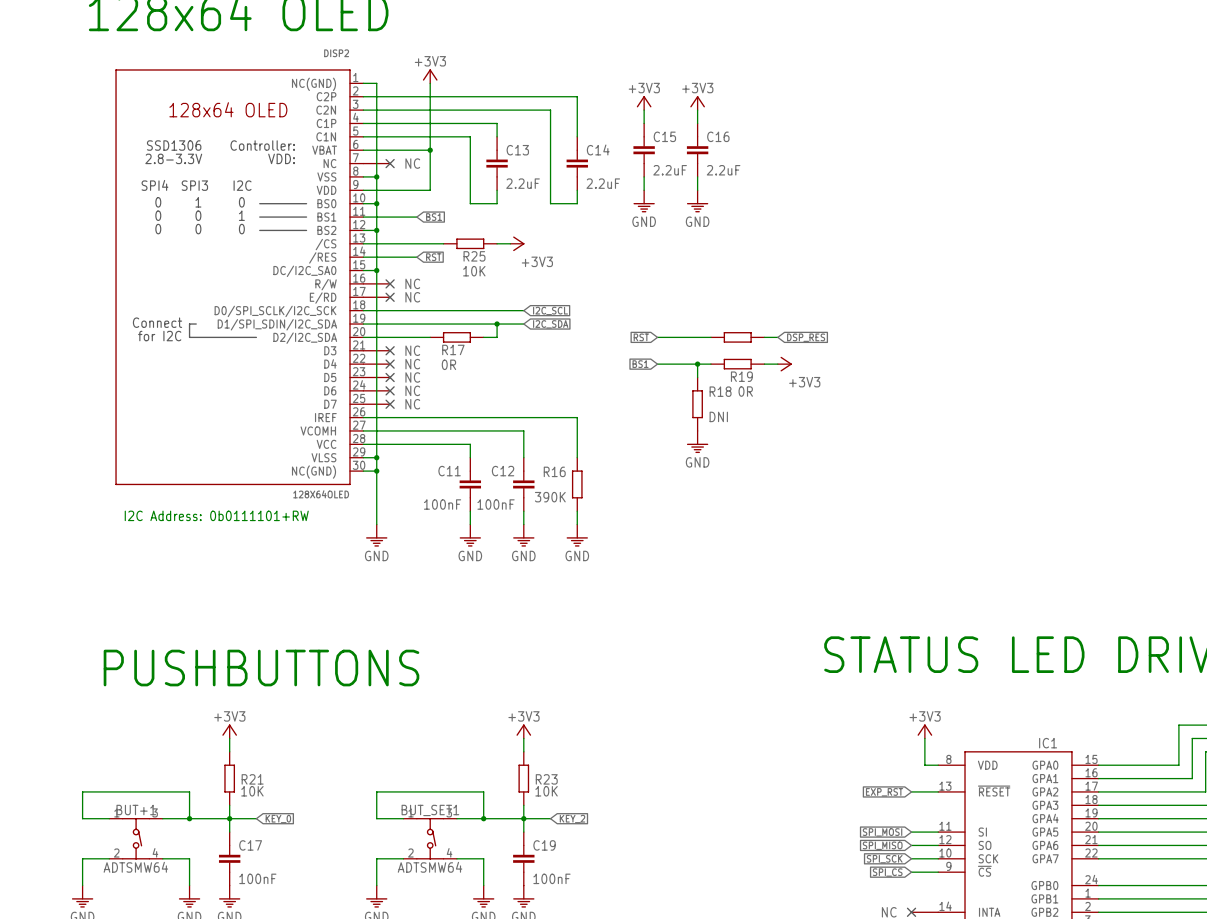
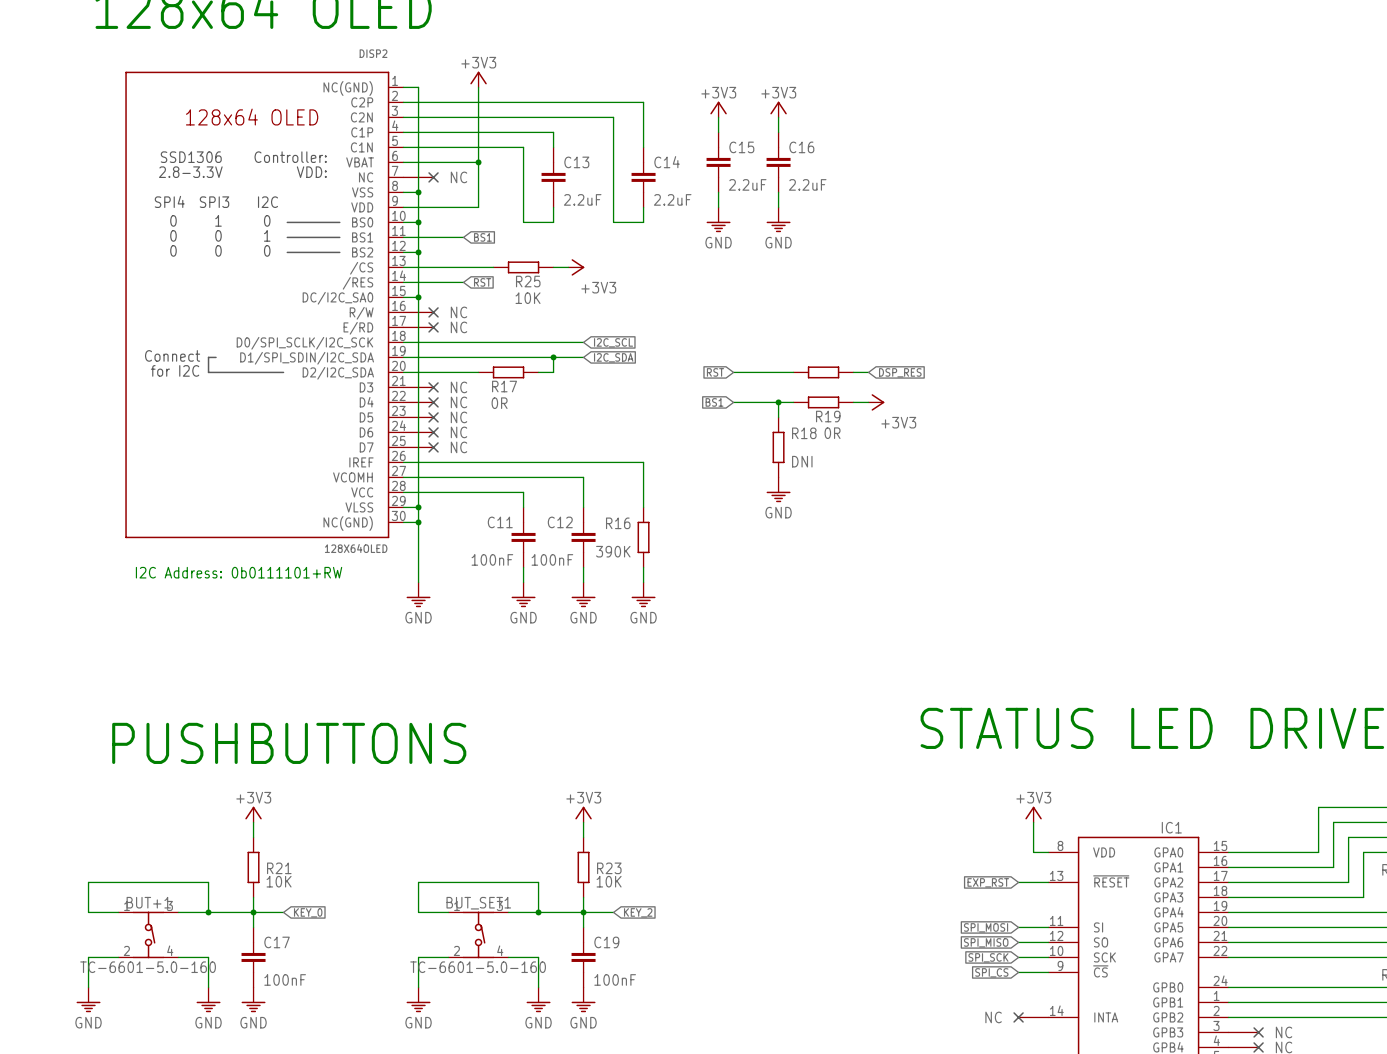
BUT+1 value: ADTSMW64 (135, 867) -> TC-6601-5.0-160 (148, 967)
BUT_SET1 value: ADTSMW64 (430, 867) -> TC-6601-5.0-160 (478, 967)

